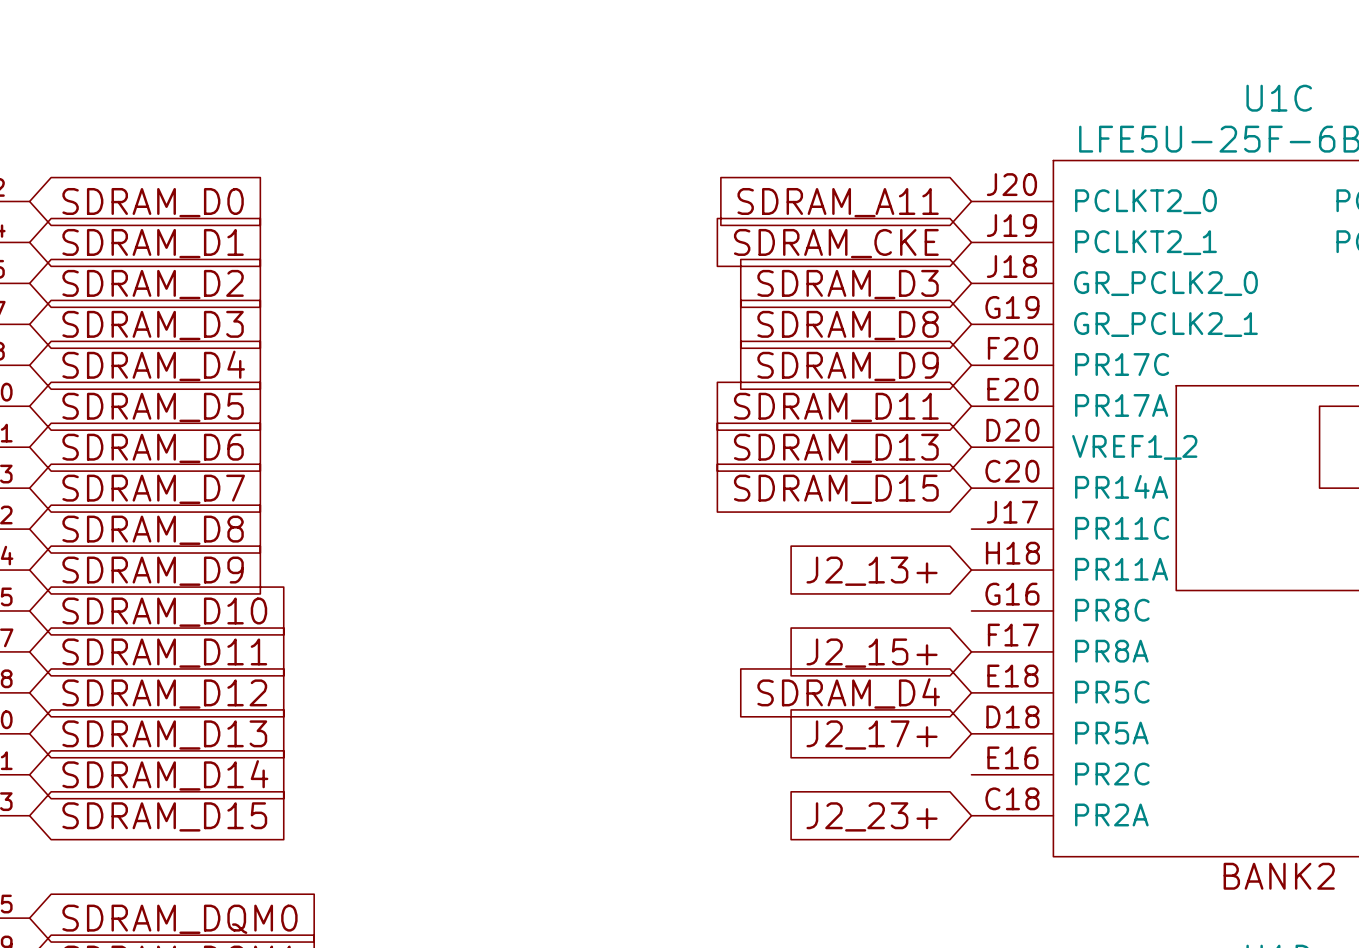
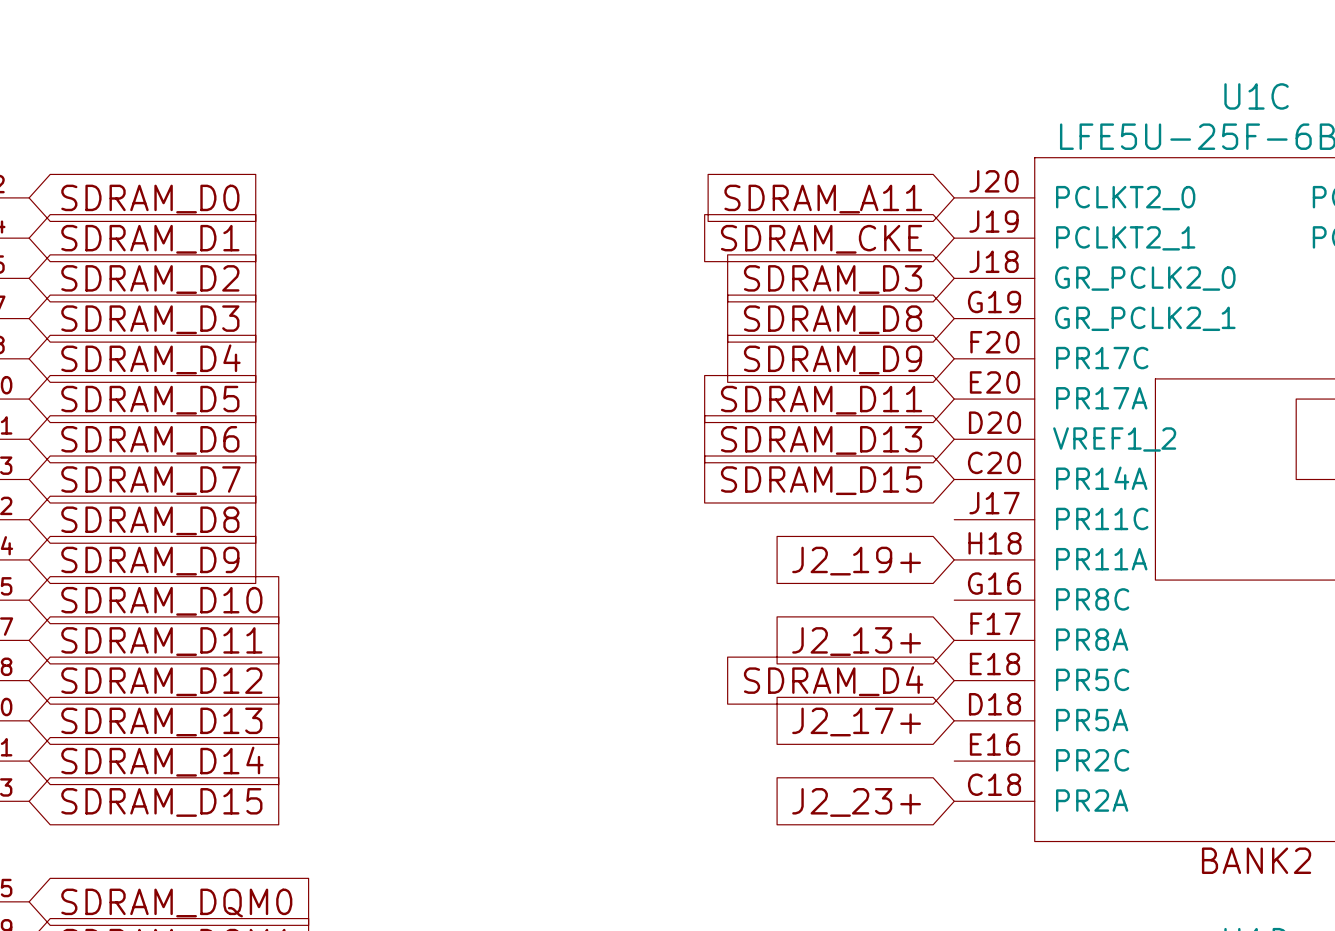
global label: J2_13+ (872, 571) -> J2_19+ (856, 561)
global label: J2_15+ (872, 653) -> J2_13+ (856, 641)

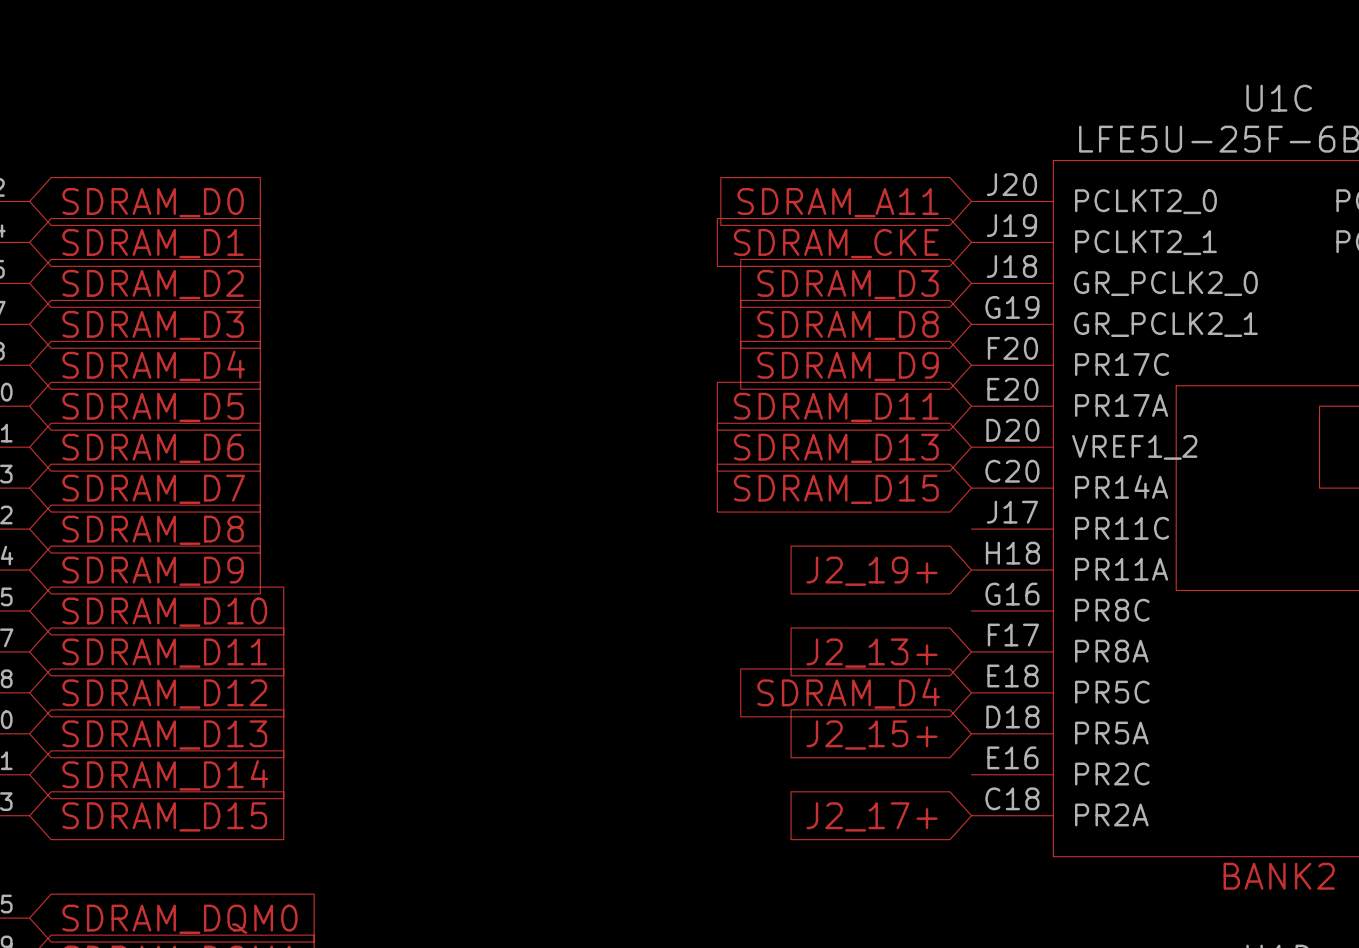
global label: J2_17+ (856, 721) -> J2_15+ (872, 734)
global label: J2_23+ (856, 802) -> J2_17+ (872, 816)

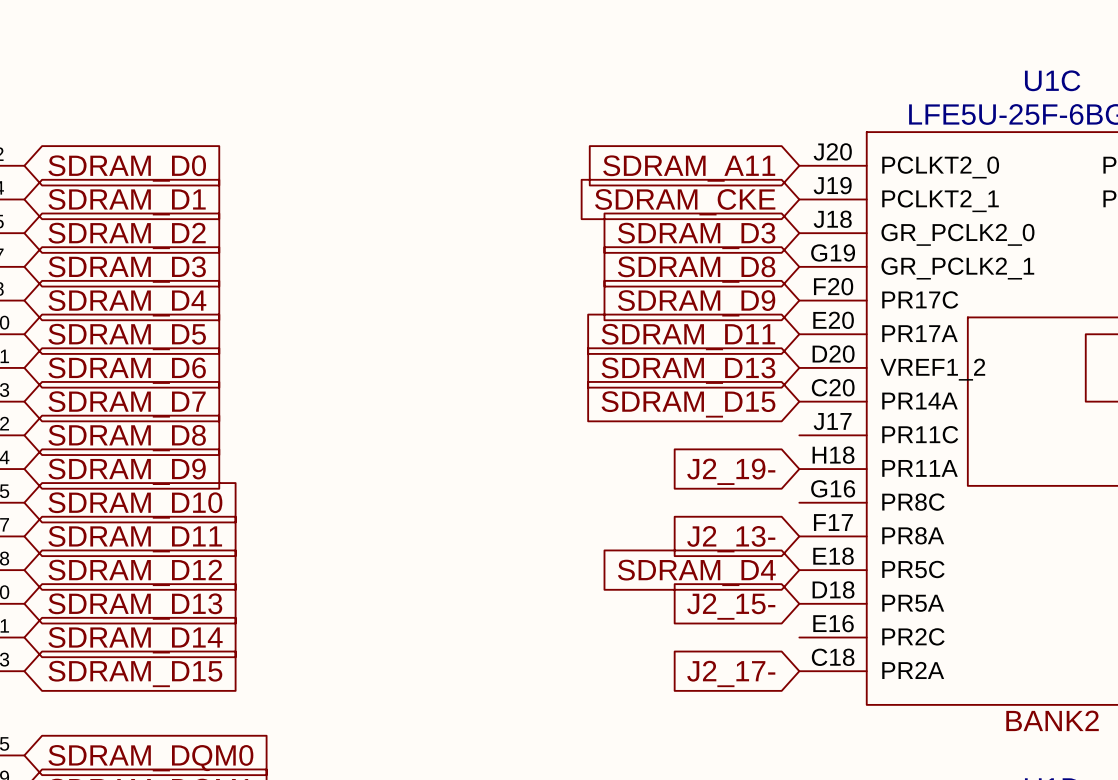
global label: J2_19+ (872, 571) -> J2_19- (731, 471)
global label: J2_13+ (872, 653) -> J2_13- (731, 539)
global label: J2_15+ (872, 734) -> J2_15- (731, 606)
global label: J2_17+ (872, 816) -> J2_17- (731, 673)

